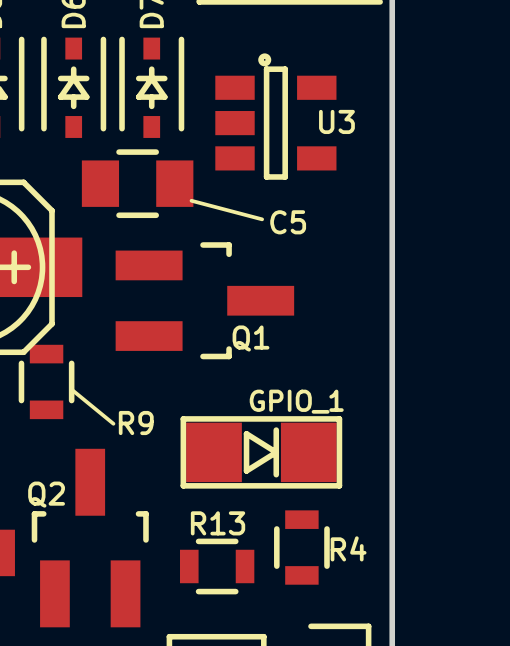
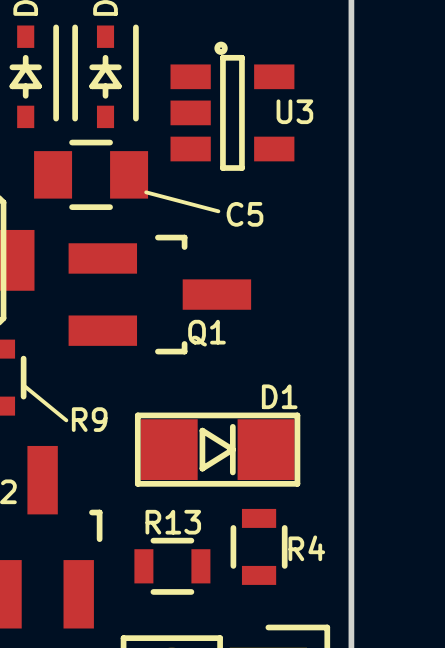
GPIO_1 name: GPIO_1 (296, 401) -> D1 (279, 396)

